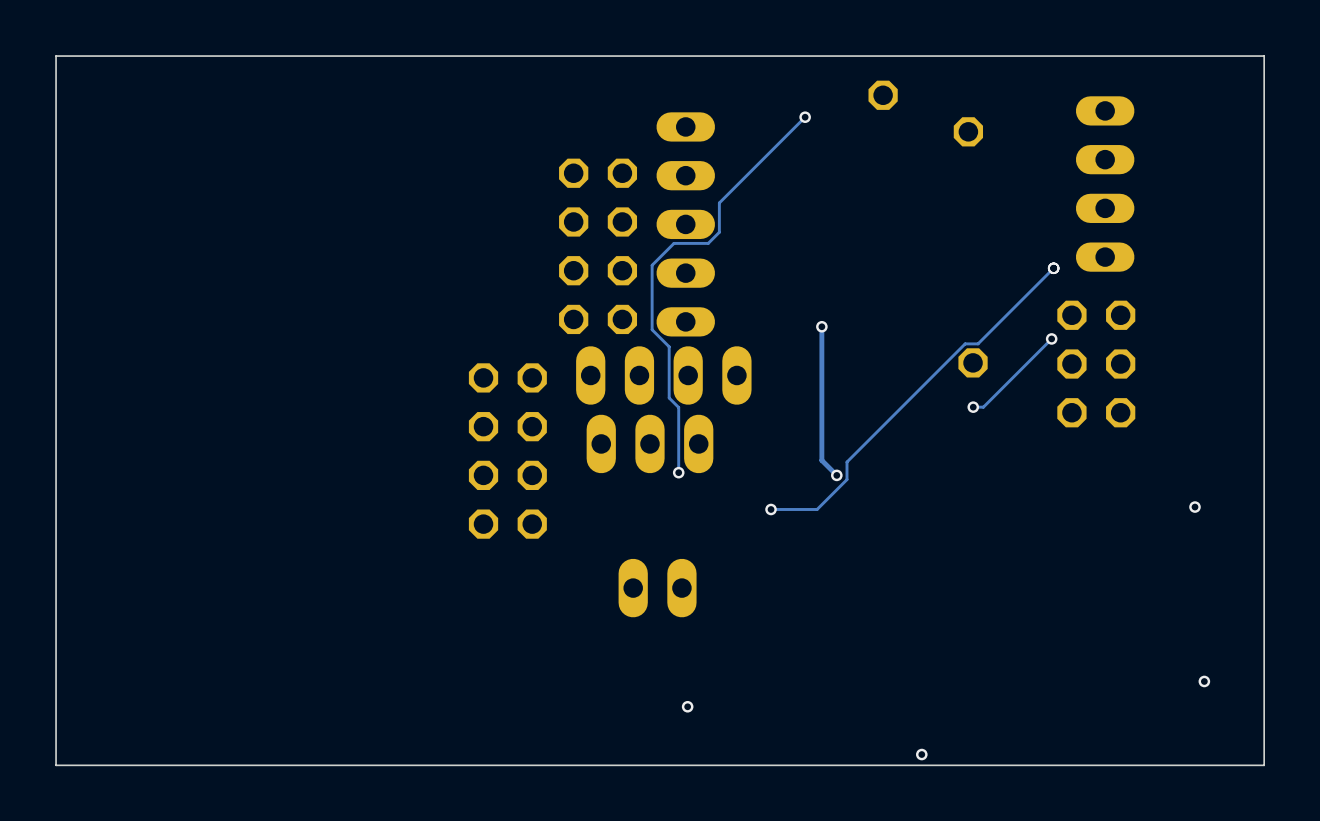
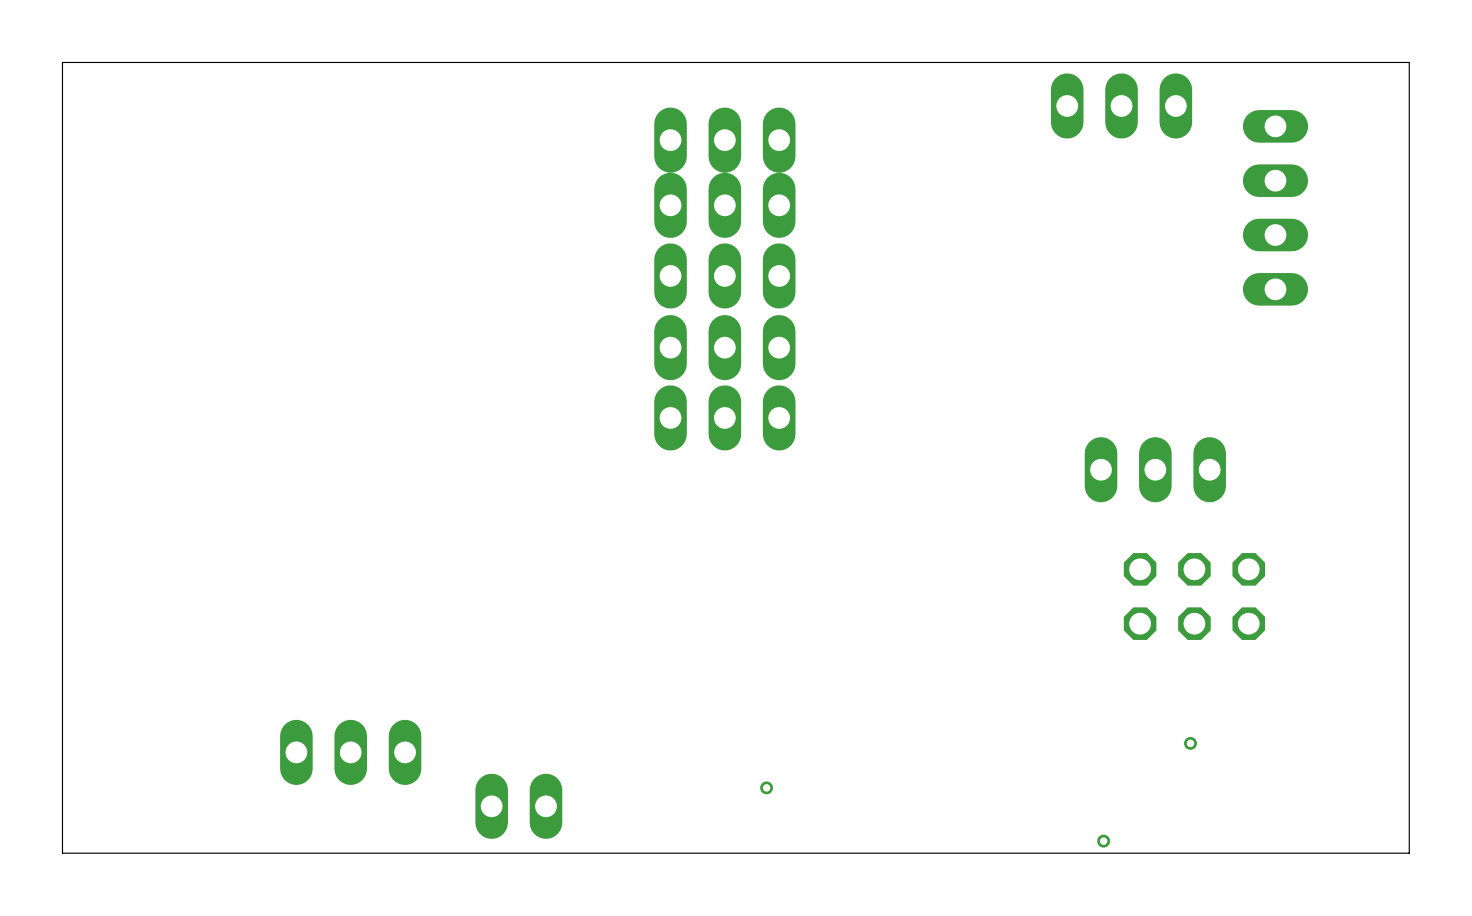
part: (883, 95) -> none
part: none -> (1121, 105)
track: (805, 117) (719, 202) (719, 232) (708, 243) (673, 243) (652, 265) (652, 329) (669, 346) (669, 397) (678, 407) (678, 472) -> none
via: (805, 117) -> none
part: none -> (724, 140)
part: (968, 131) -> none
part: none -> (724, 205)
part position: (1105, 184) -> (1275, 207)
part: (685, 224) -> none
part: (598, 246) -> none
part: none -> (724, 275)
track: (1053, 268) (978, 343) (965, 343) (847, 462) (847, 479) (817, 509) (771, 509) -> none
via: (1053, 268) -> none
part: none -> (724, 347)
track: (821, 326) (821, 460) (836, 475) -> none
via: (821, 326) -> none
track: (1051, 338) (983, 407) (973, 407) -> none
via: (1051, 338) -> none
part footprint: [576, 346, 752, 405] -> [654, 385, 796, 451]
part: (973, 362) -> none
part rotation: 0° (1096, 364) -> 90° clockwise (1194, 596)
part position: (1096, 364) -> (1194, 596)
via: (973, 407) -> none
part: none -> (1155, 469)
part: (649, 443) -> none
part: (507, 451) -> none
via: (678, 472) -> none
via: (836, 475) -> none
via: (1194, 507) -> none
via: (771, 509) -> none
part position: (657, 588) -> (518, 806)
via: none -> (1190, 743)
part: none -> (350, 752)
via: (1204, 681) -> none
via position: (921, 754) -> (1103, 841)

